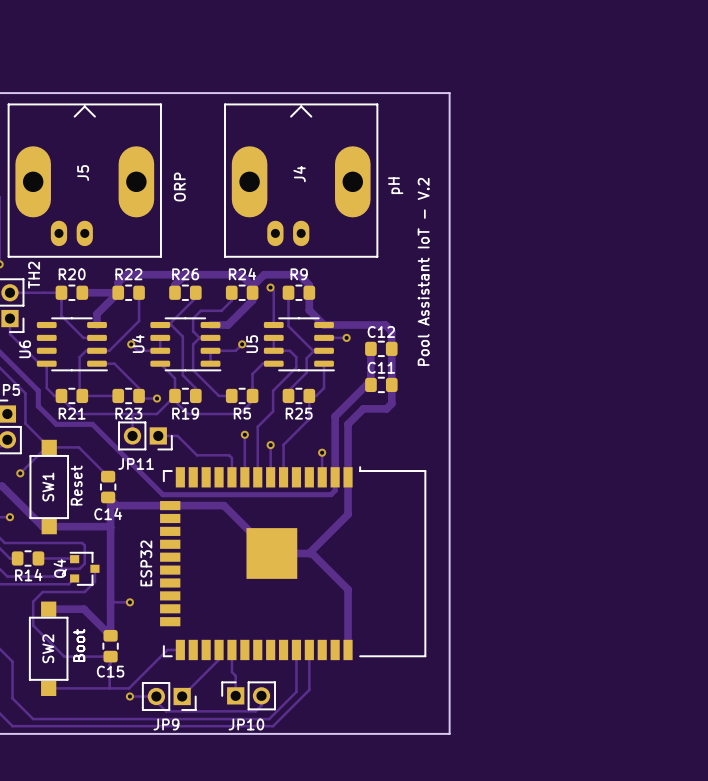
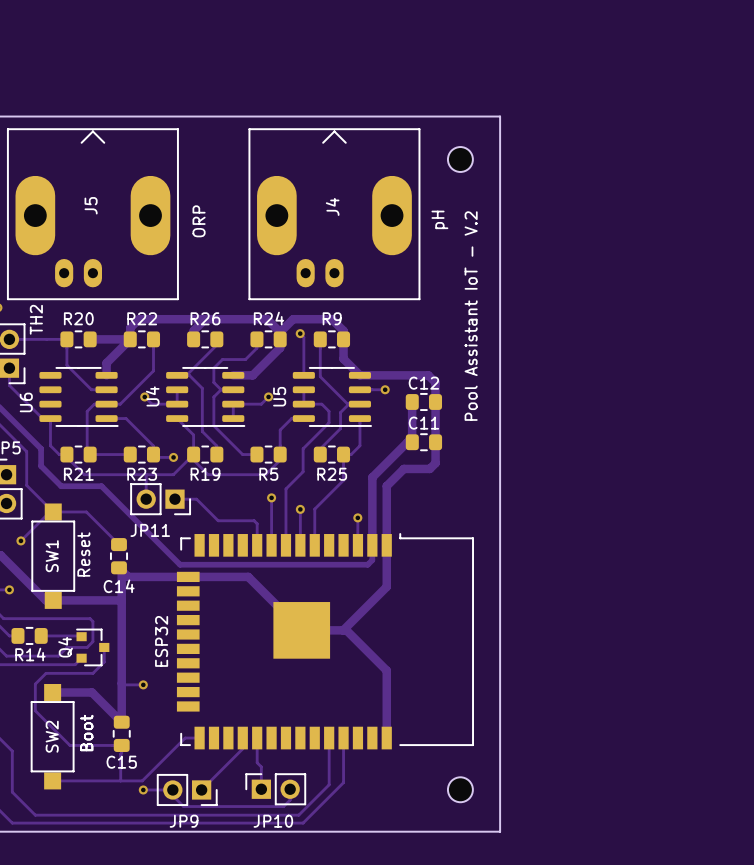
part: none -> (460, 159)
part: none -> (460, 789)

